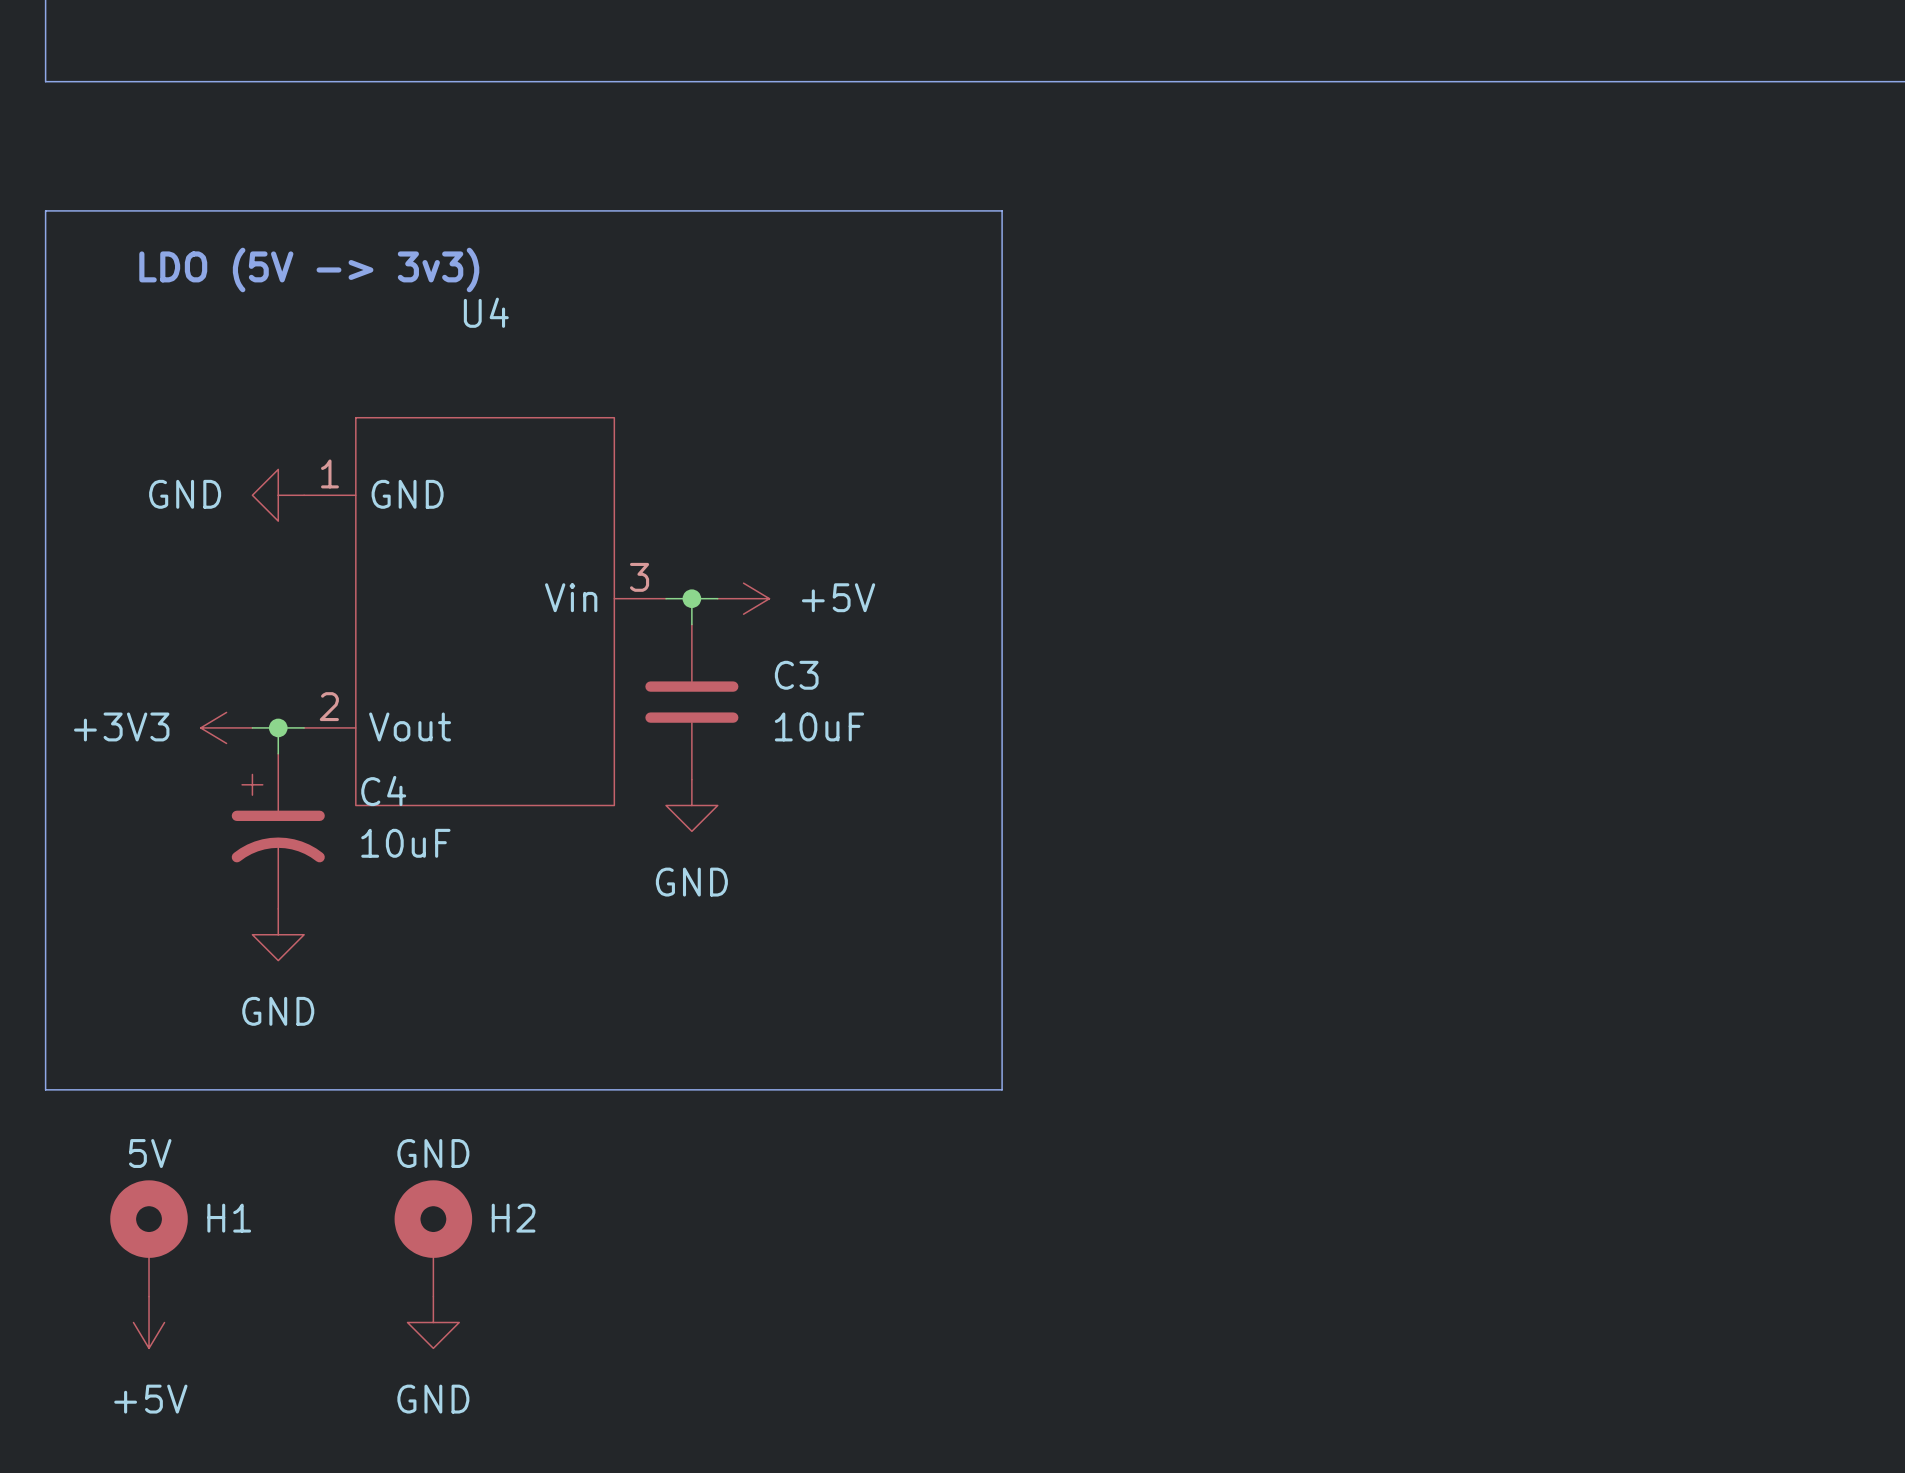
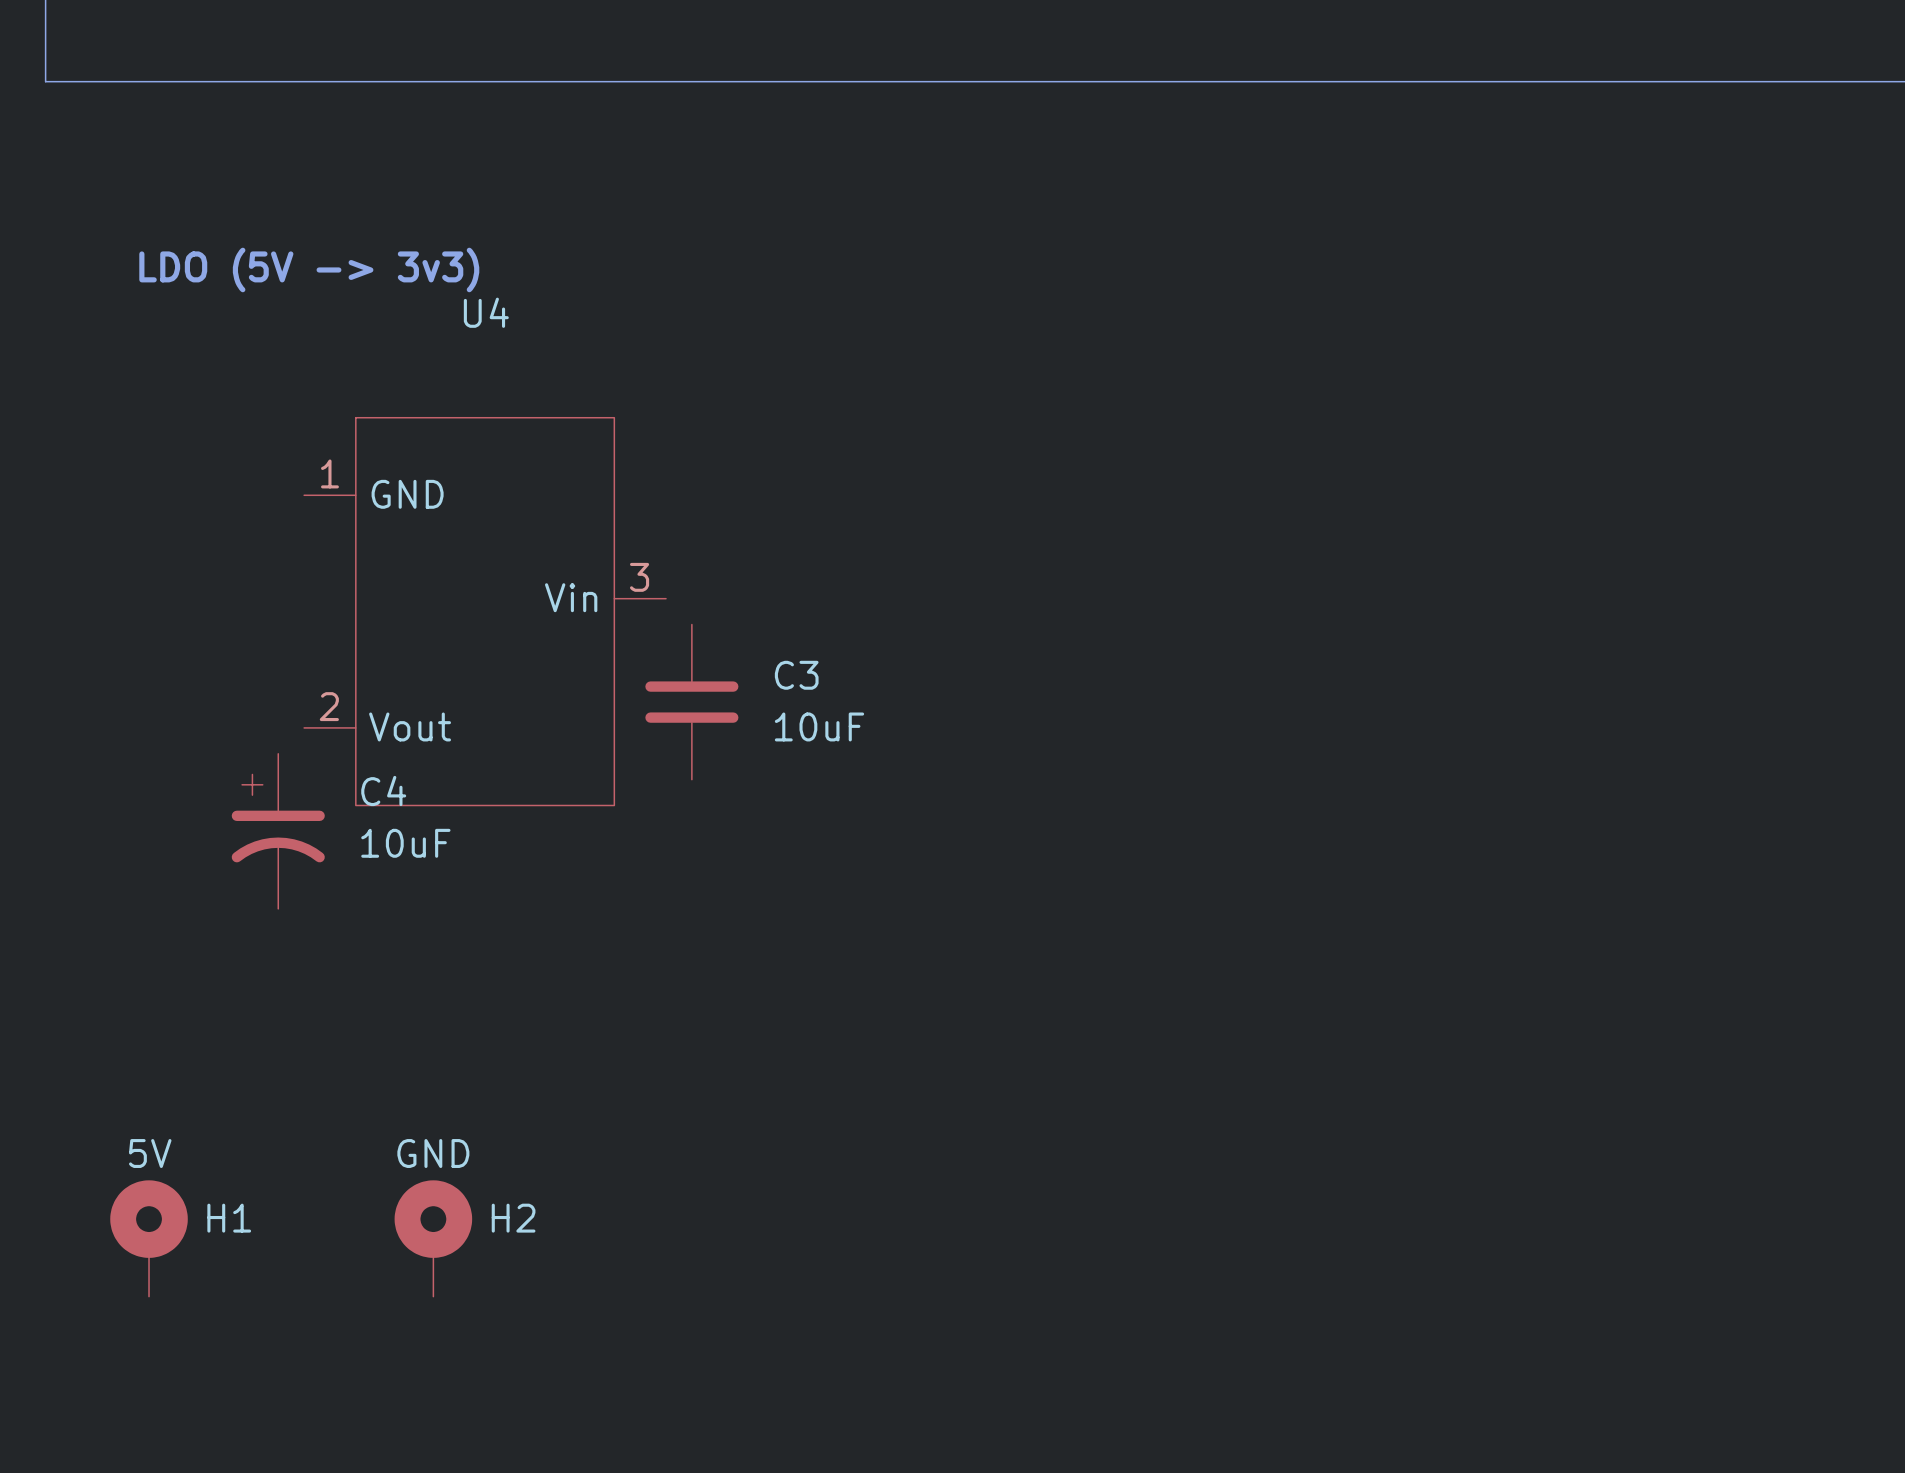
line: (45, 210) (45, 1089) (1002, 1089) (1002, 210) (45, 210) -> none
power symbol: GND (278, 495) -> none
wire: (666, 598) (717, 598) -> none
wire: (691, 598) (691, 624) -> none
junction: (691, 598) -> none
power symbol: +5V (743, 598) -> none
power symbol: +3V3 (226, 727) -> none
wire: (252, 727) (304, 727) -> none
wire: (278, 727) (278, 753) -> none
junction: (278, 727) -> none
power symbol: GND (691, 805) -> none
power symbol: GND (278, 934) -> none
power symbol: +5V (149, 1322) -> none
power symbol: GND (433, 1322) -> none

